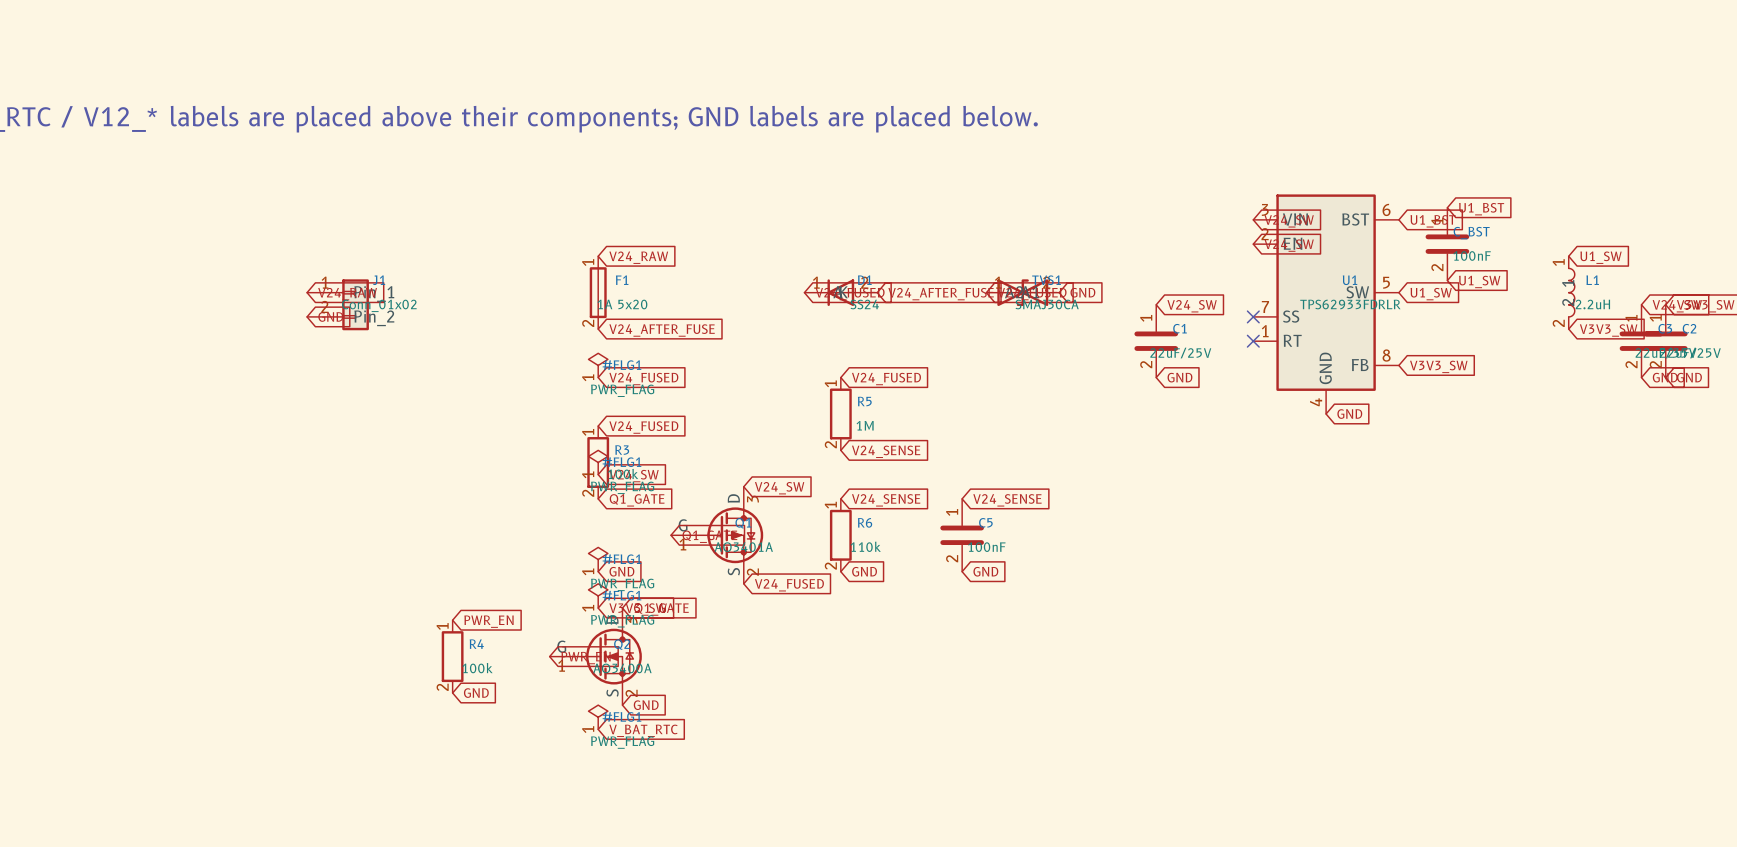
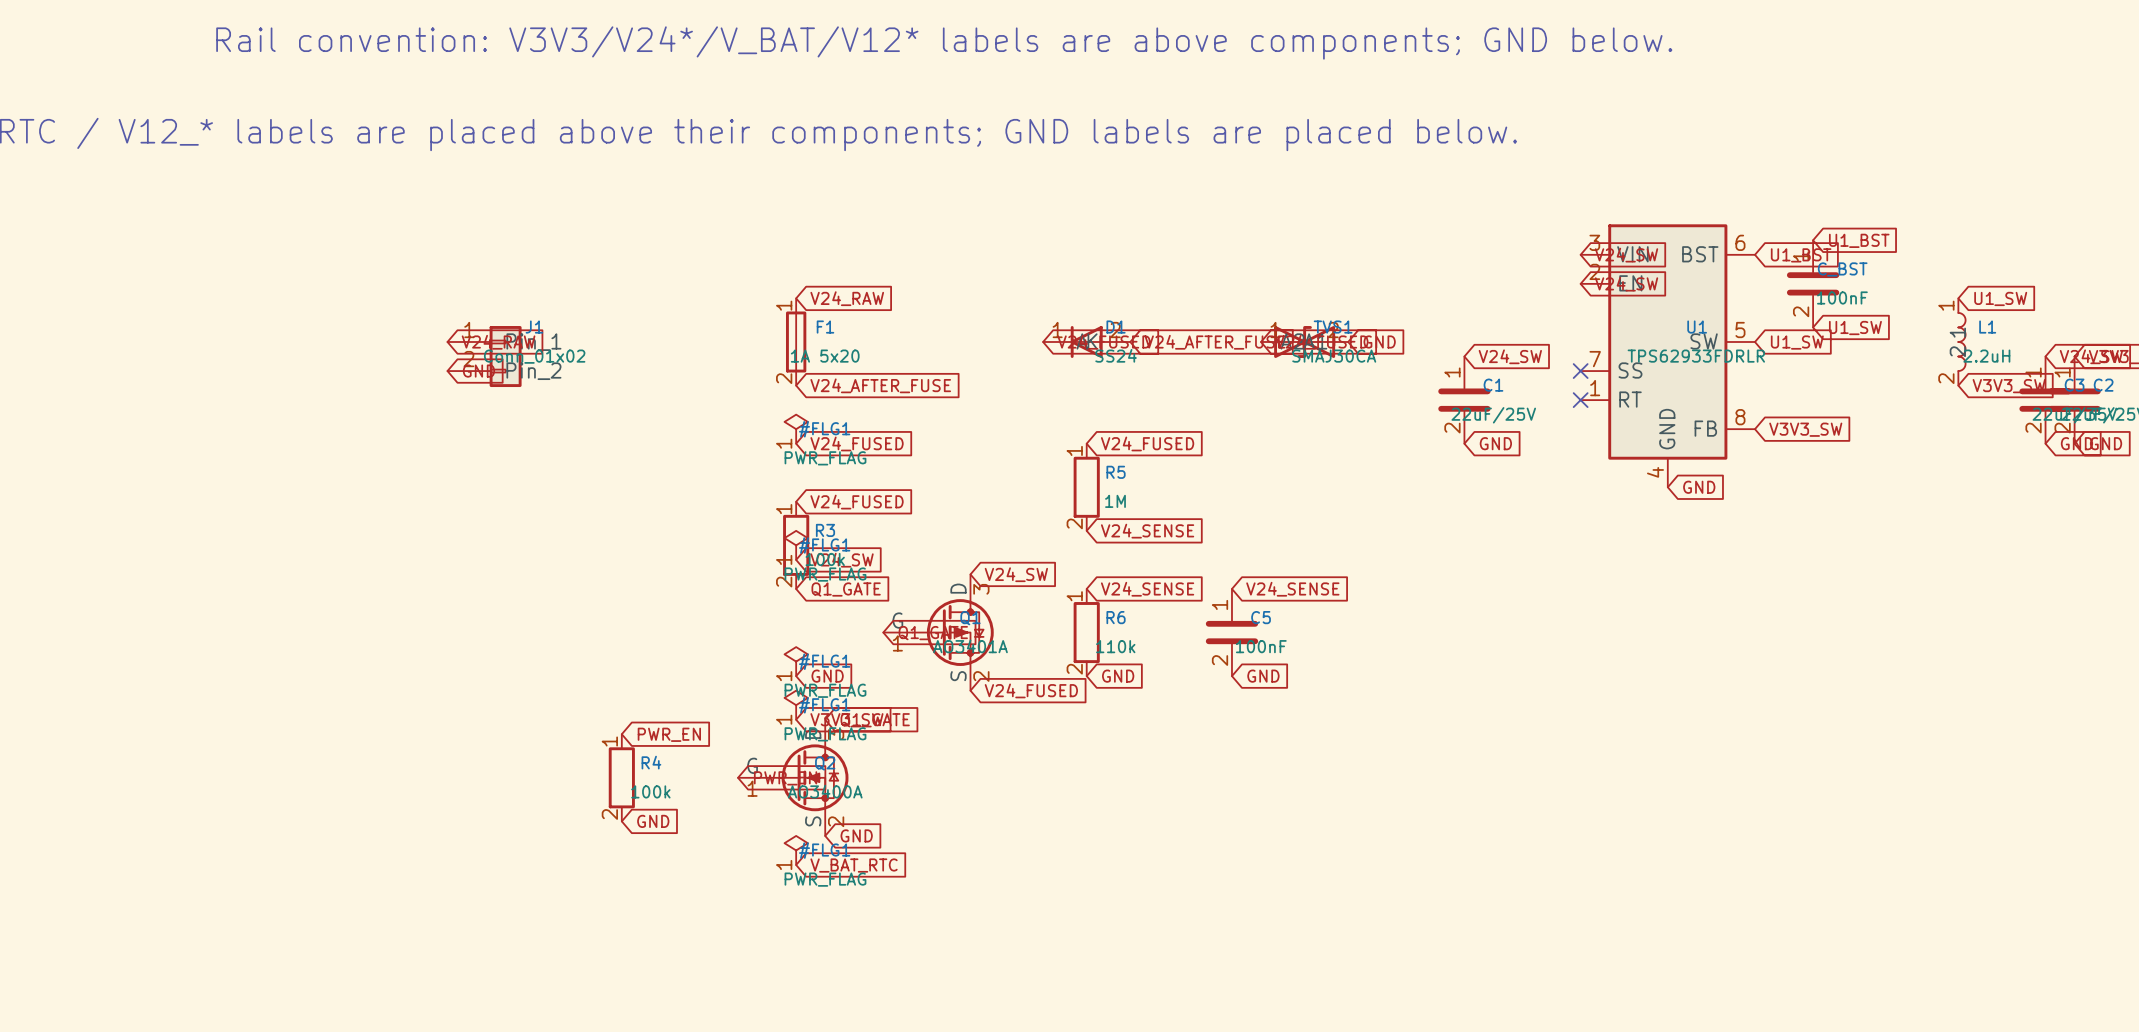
text: none -> Rail convention: V3V3/V24*/V_BAT/V12* labels are above components; GND below. (944, 42)

